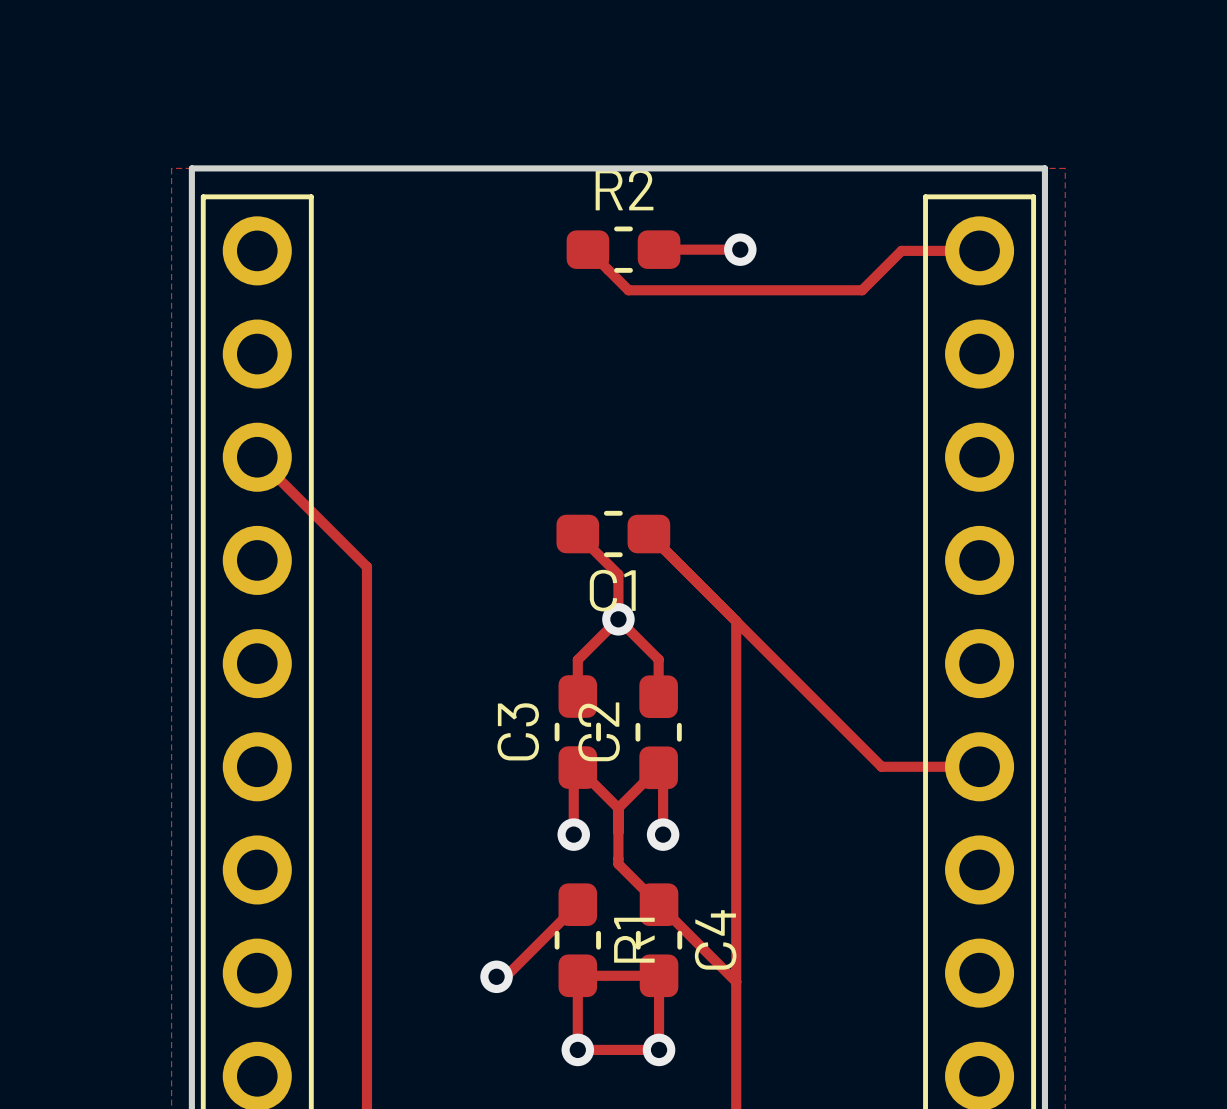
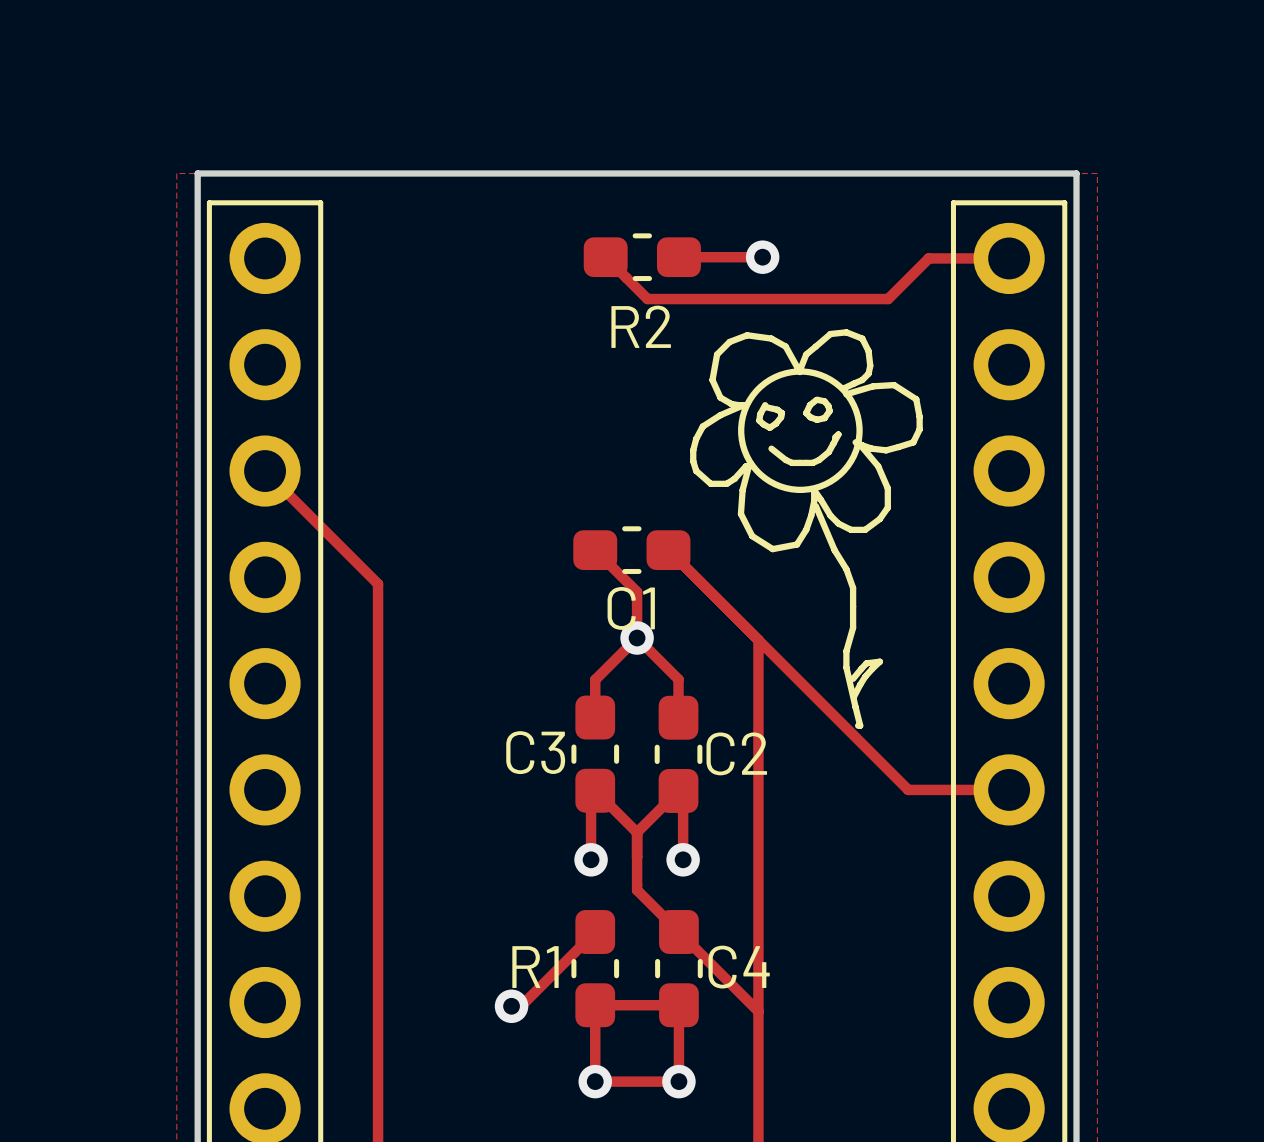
R2 name position: R2 (624, 189) -> R2 (641, 326)
drawing: none -> [690, 329, 923, 729]
C3 name rotation: 0° (518, 731) -> 90° clockwise (535, 752)
C2 name rotation: 0° (599, 731) -> 90° clockwise (736, 753)
C2 name position: C2 (599, 731) -> C2 (736, 753)
C4 name rotation: 0° (715, 939) -> 90° clockwise (739, 967)
R1 name rotation: 0° (634, 940) -> 90° clockwise (535, 967)
R1 name position: R1 (634, 940) -> R1 (535, 967)

